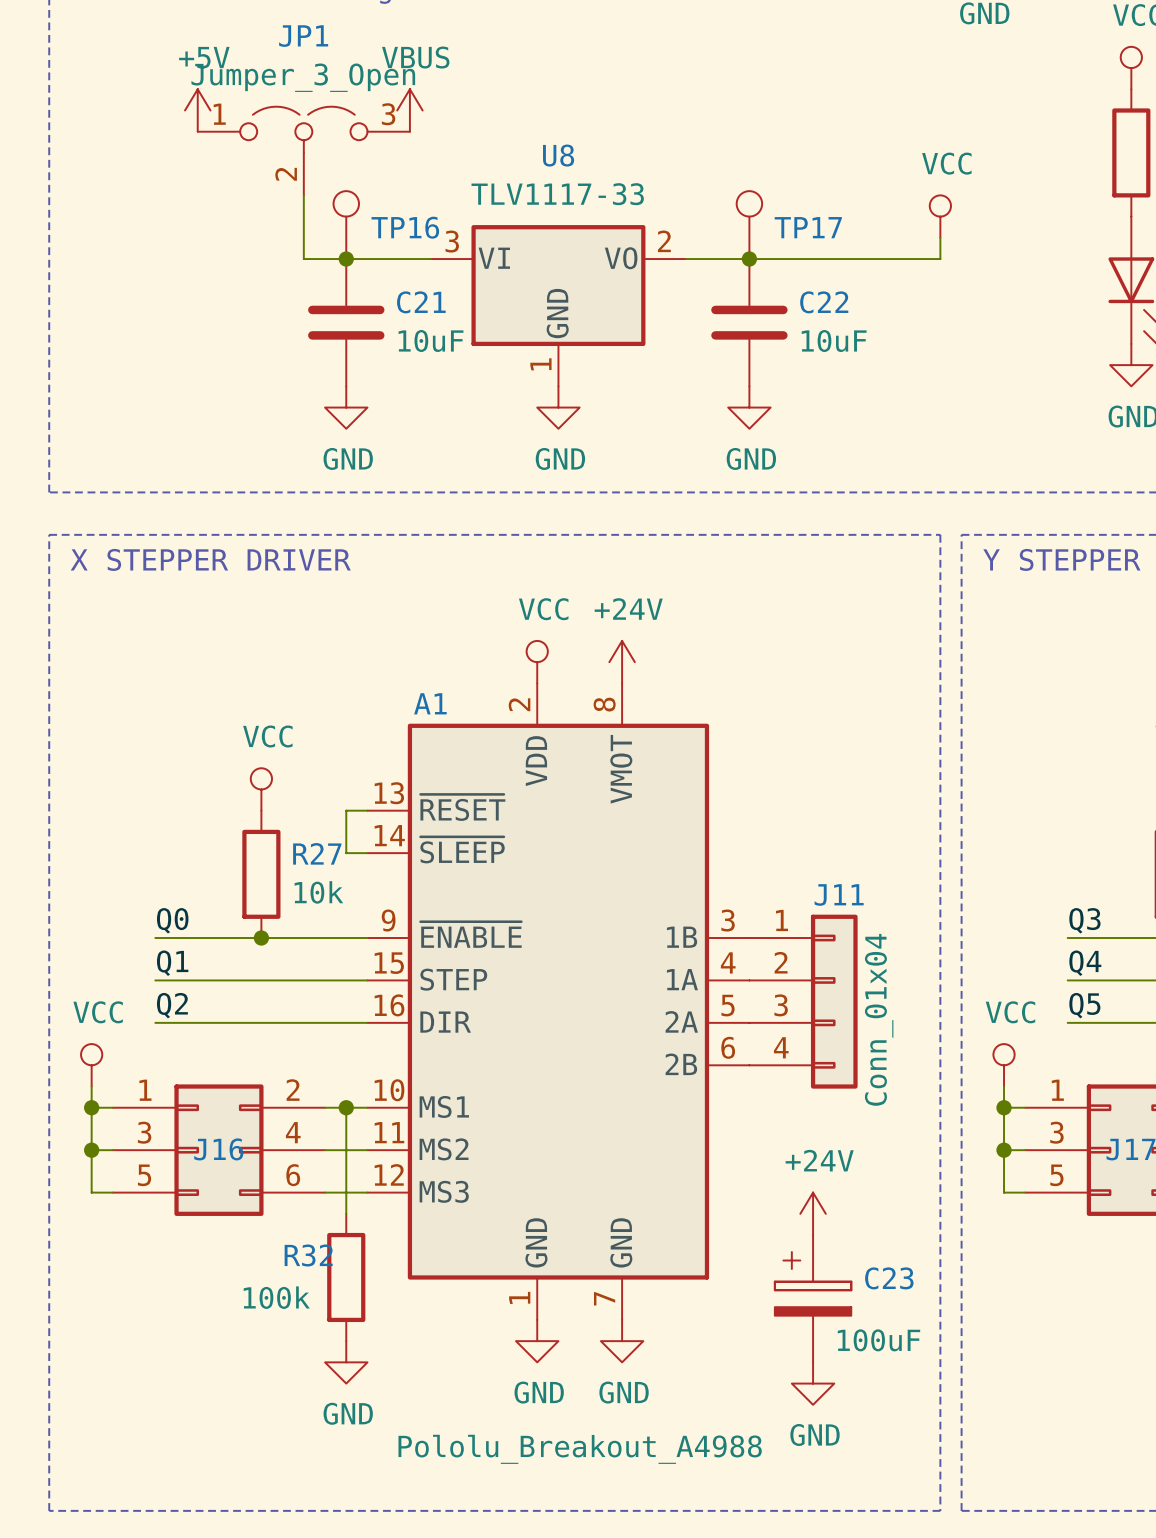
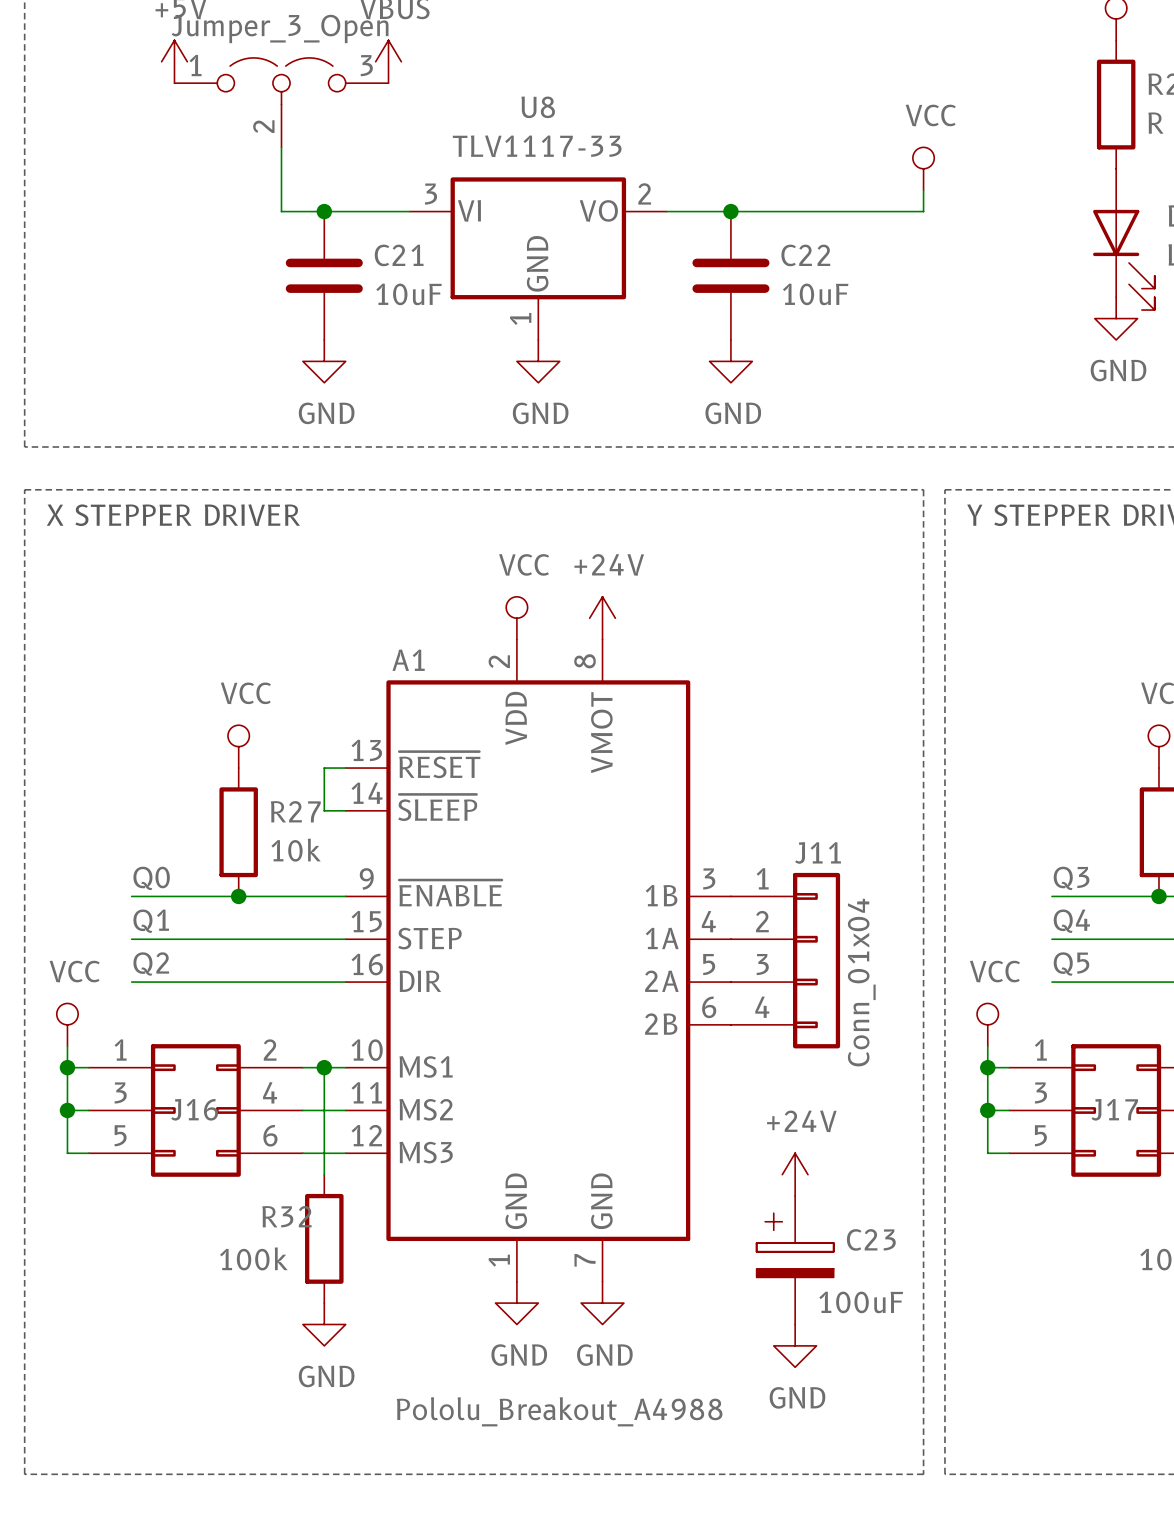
TP16: (346, 225) -> none
TP17: (749, 225) -> none

